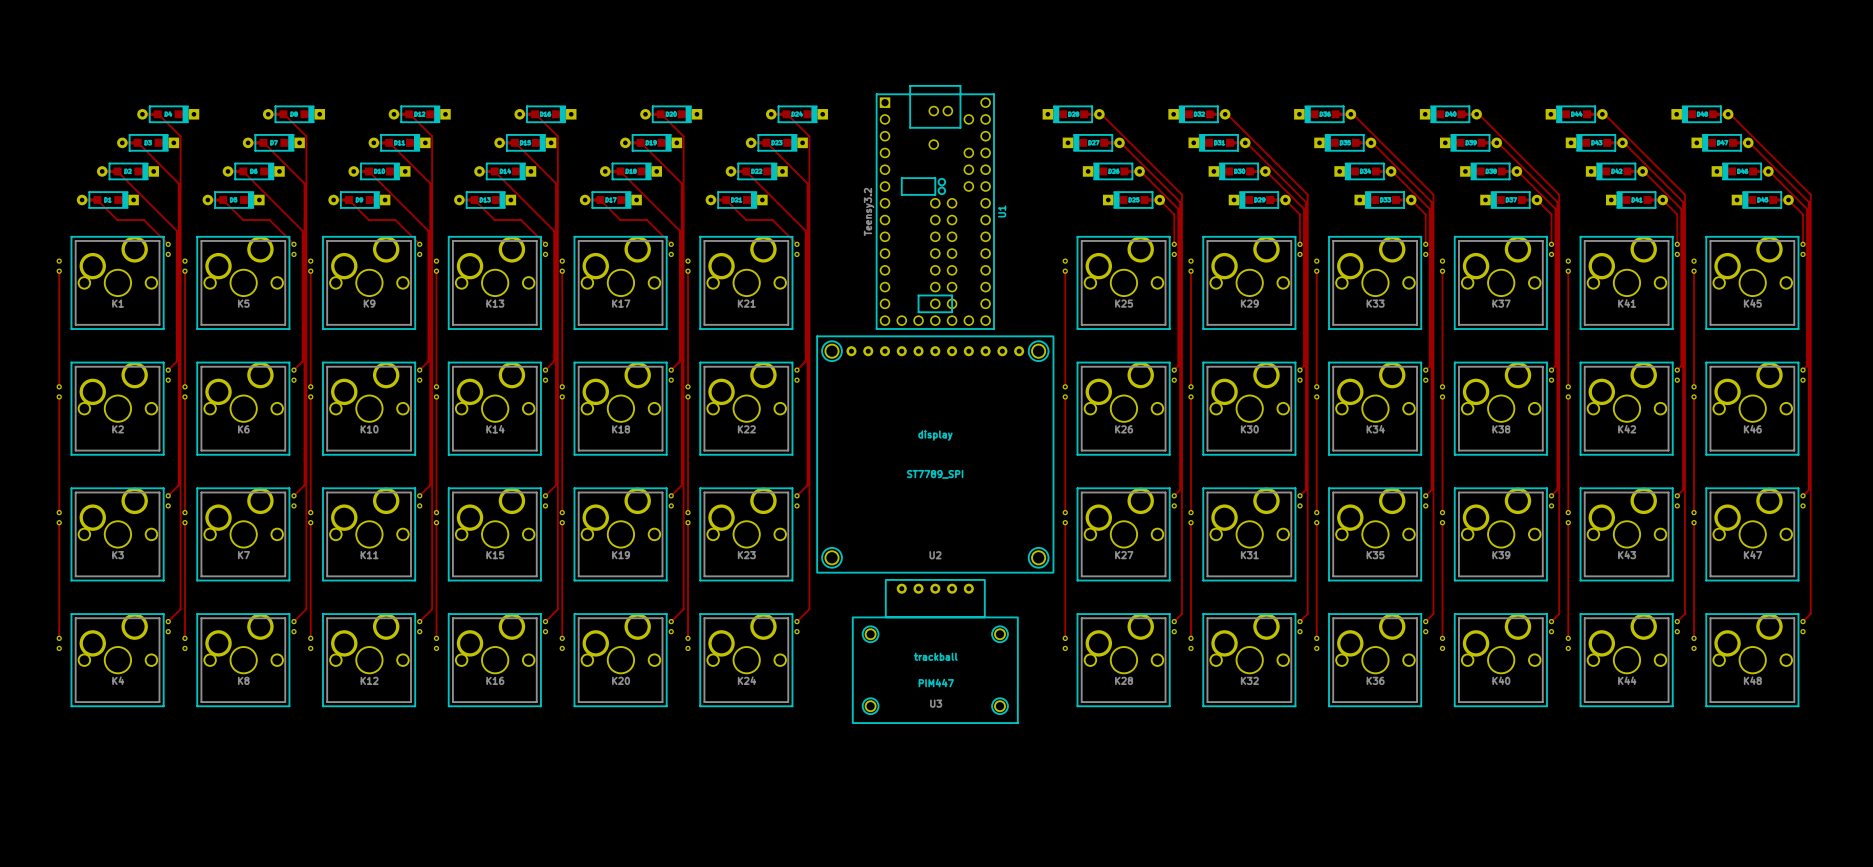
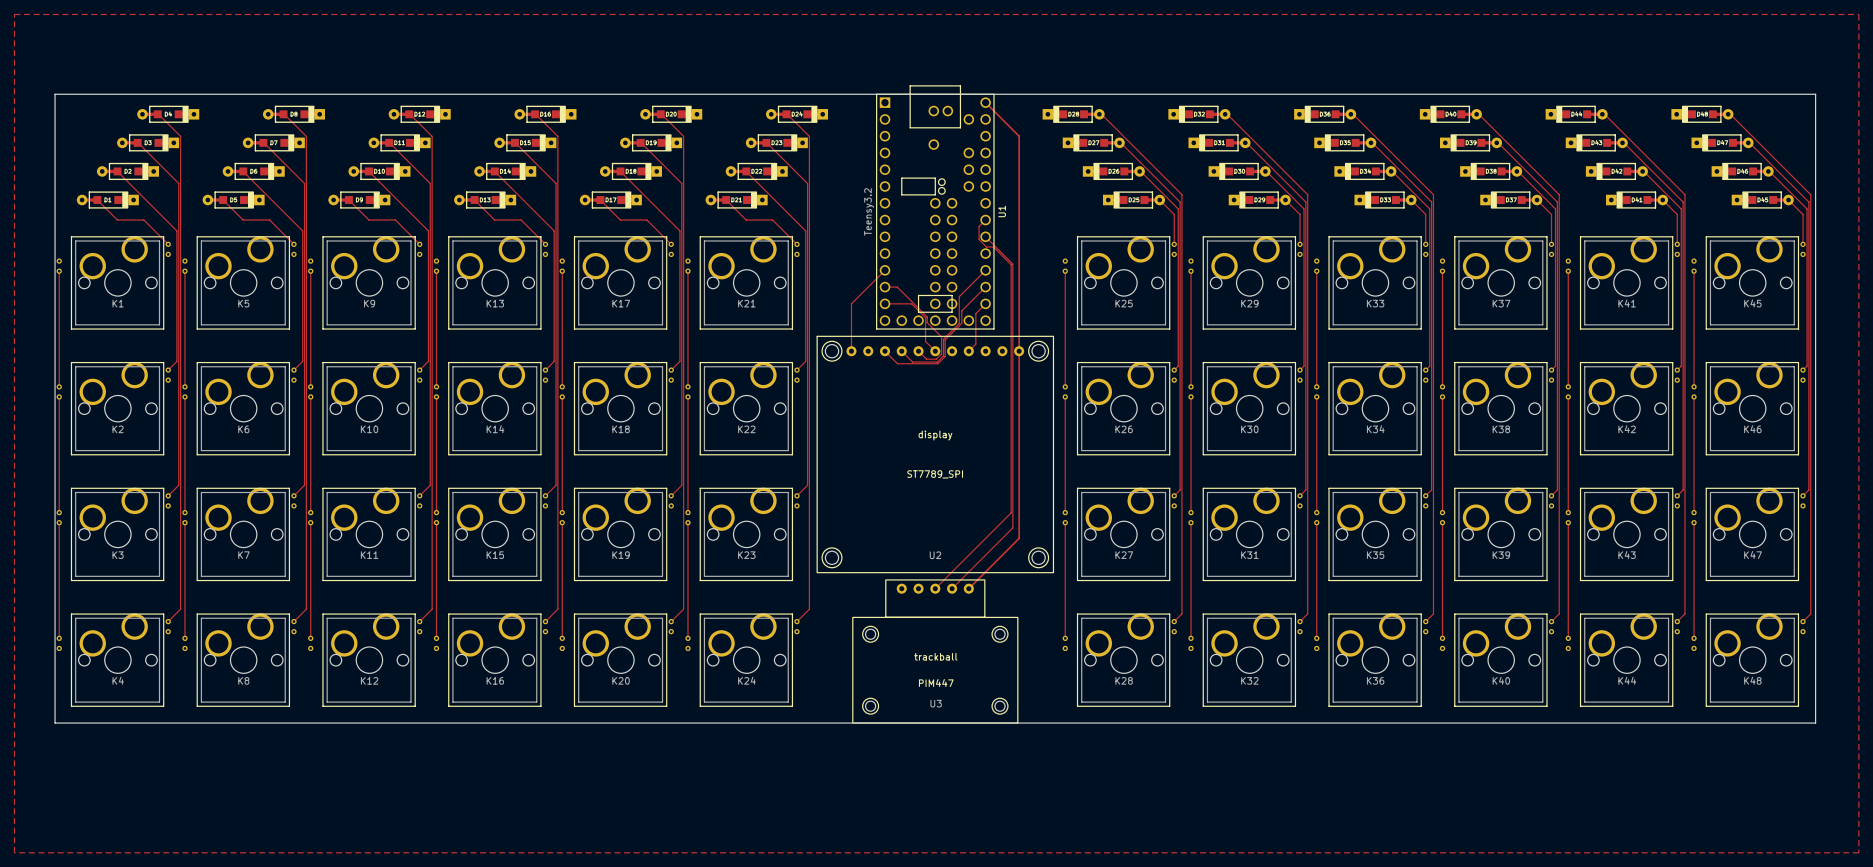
zone outline: none -> (14, 14) (14, 852) (1858, 852) (1858, 14) (14, 14)
board edge: none -> (55, 94) (1815, 94) (1815, 723) (55, 723) (55, 94)
track: none -> (985, 102) (1019, 136) (1019, 538) (968, 588)
track: none -> (985, 220) (979, 226) (979, 239) (986, 247) (993, 247) (1011, 264) (1011, 512) (935, 588)
track: none -> (985, 236) (1012, 264) (1012, 527) (952, 588)
track: none -> (885, 270) (851, 303) (851, 351)
track: none -> (985, 270) (959, 296) (959, 323) (943, 339) (943, 355) (937, 362) (912, 362) (901, 351)
track: none -> (885, 287) (897, 287) (927, 317) (927, 322) (941, 337) (941, 353) (936, 359) (926, 359) (918, 351)
track: none -> (985, 287) (961, 310) (961, 323) (945, 339) (945, 356) (937, 363) (897, 363) (885, 351)
track: none -> (885, 303) (911, 303) (925, 317) (925, 341) (935, 351)
track: none -> (985, 303) (975, 313) (975, 344) (968, 351)

